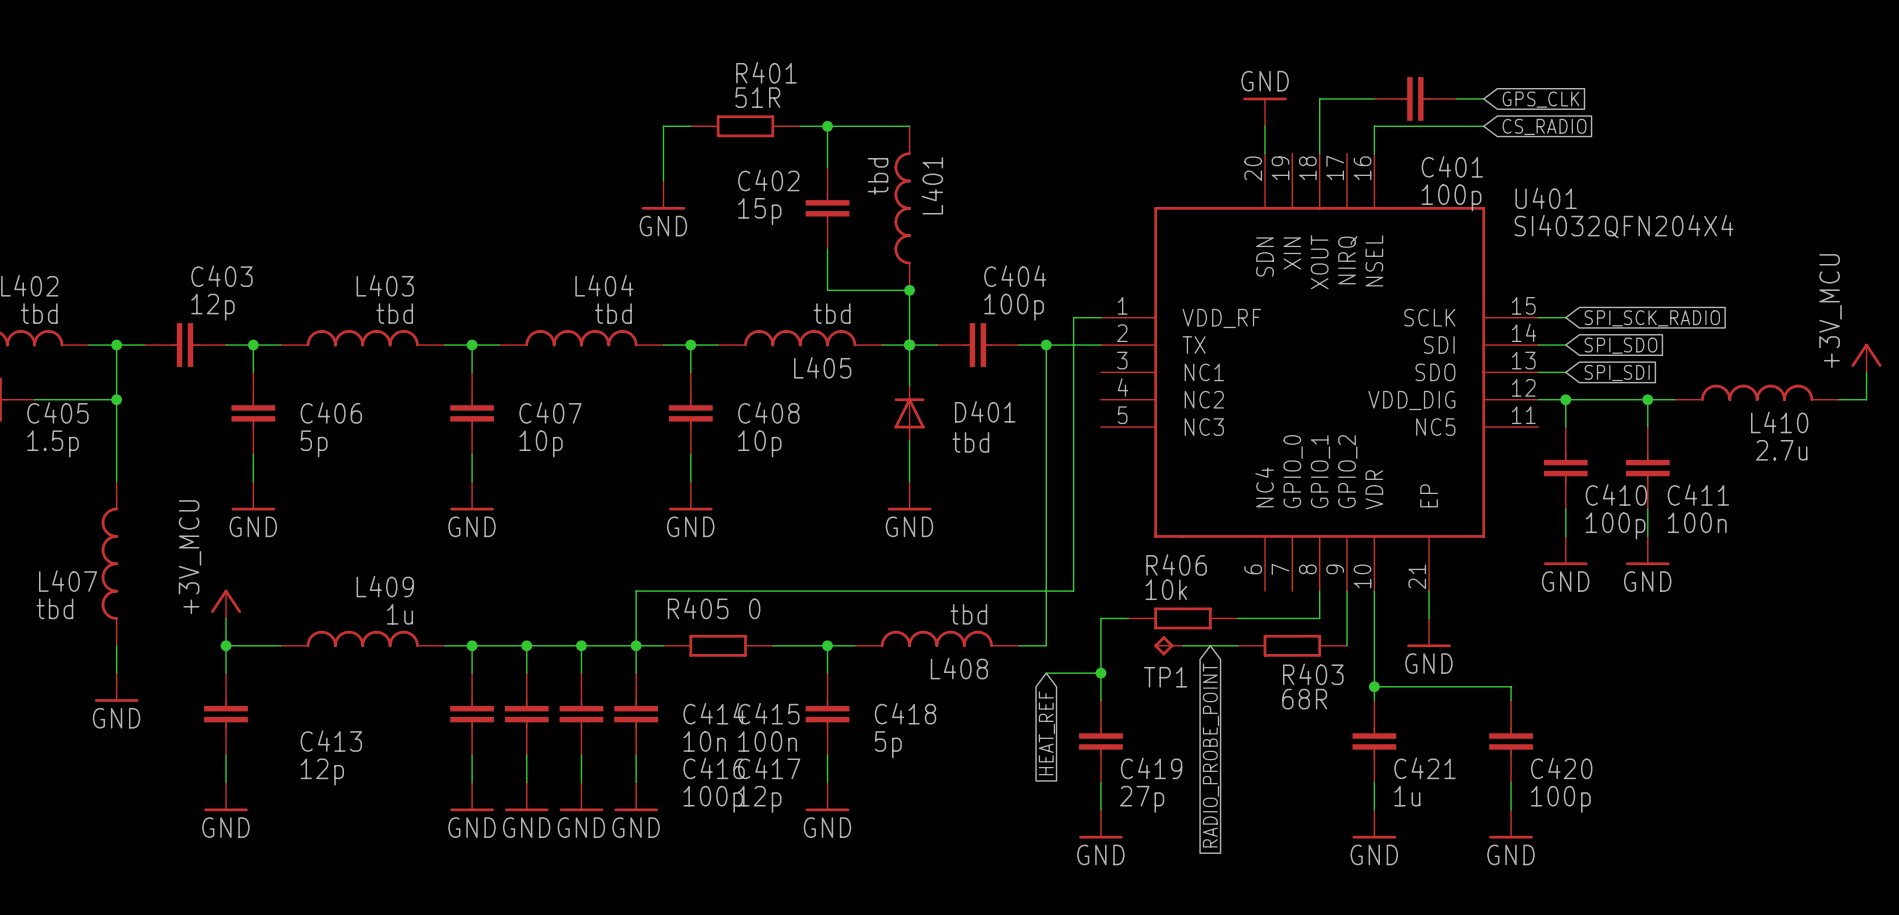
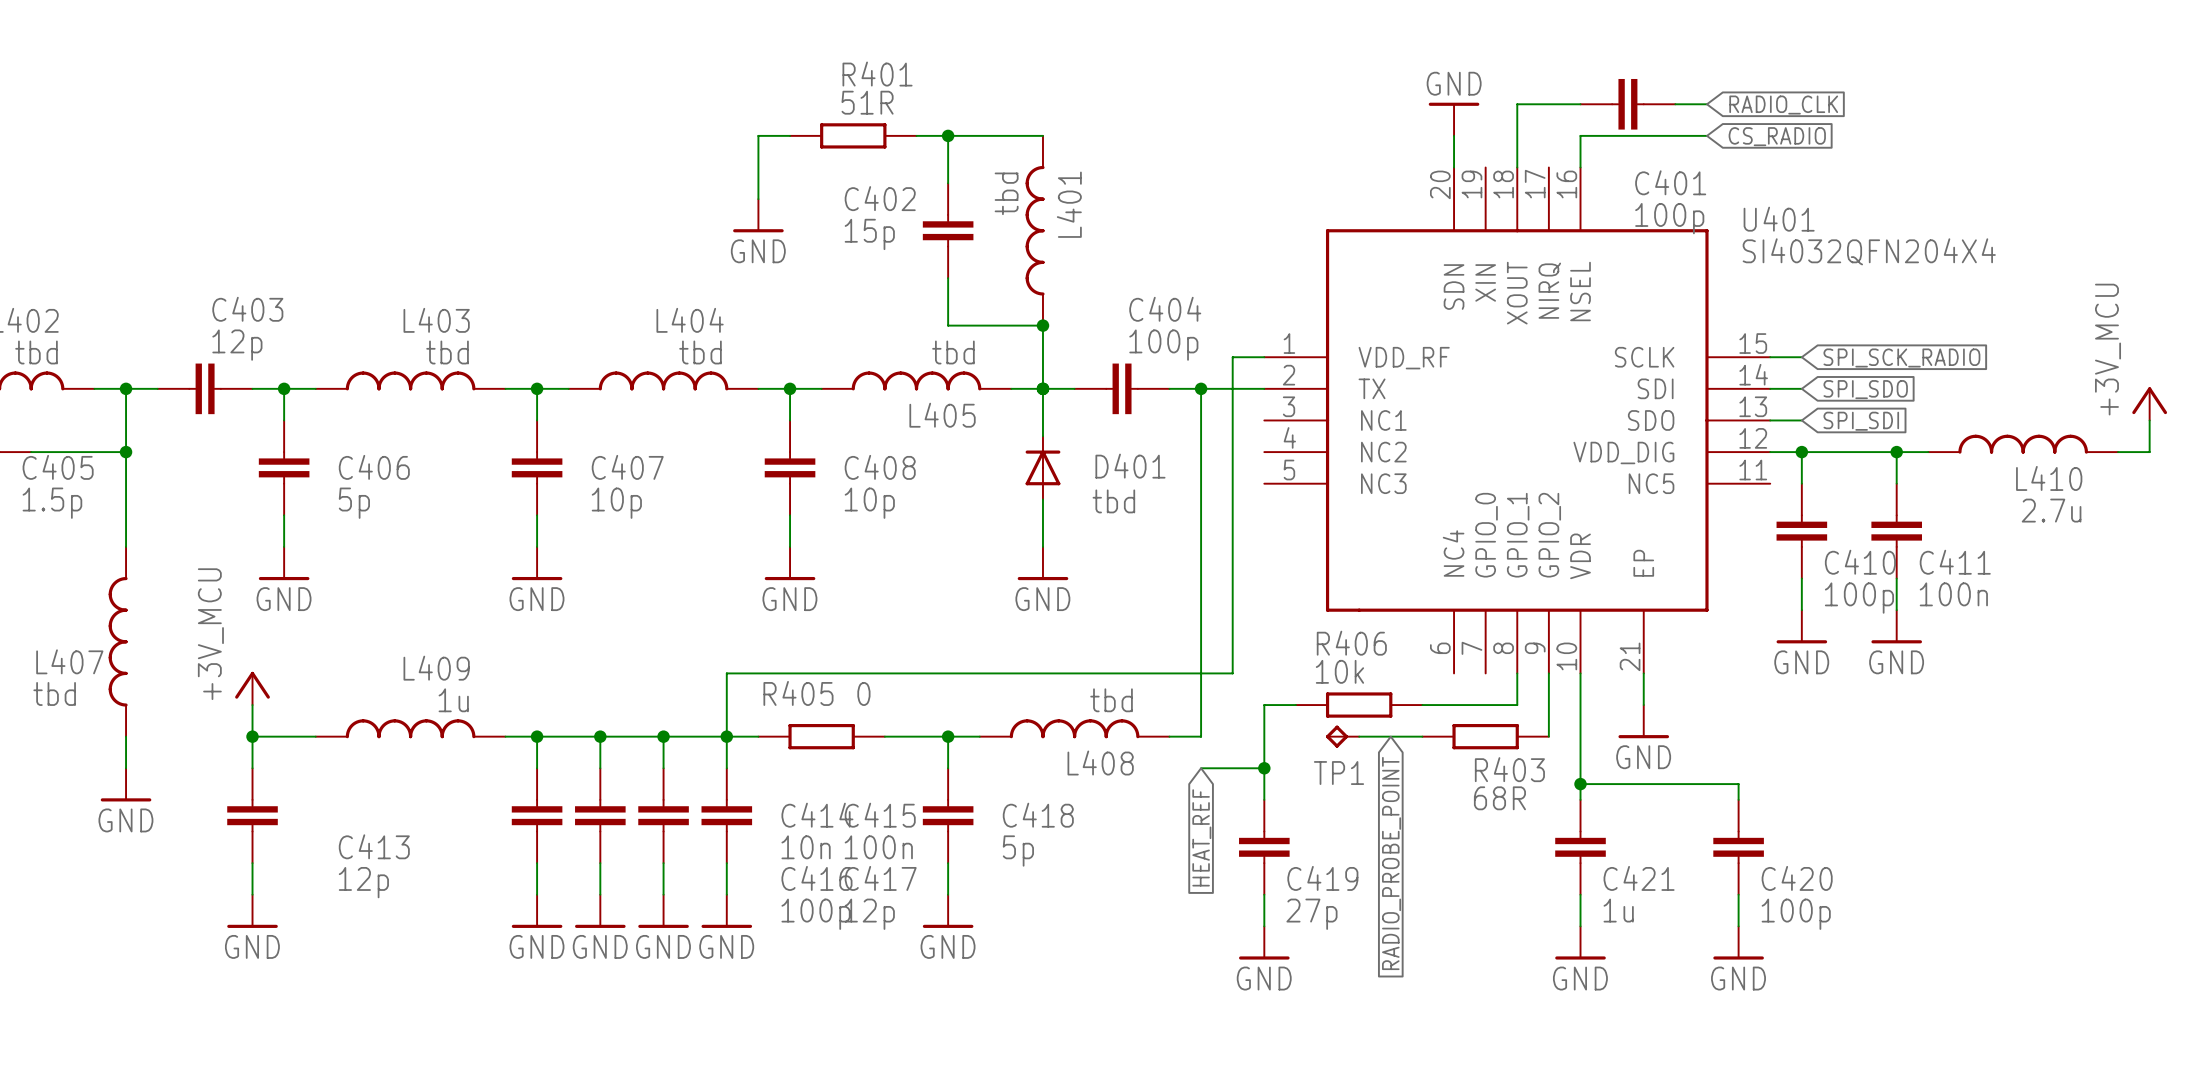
global label: GPS_CLK (1540, 99) -> RADIO_CLK (1783, 105)

